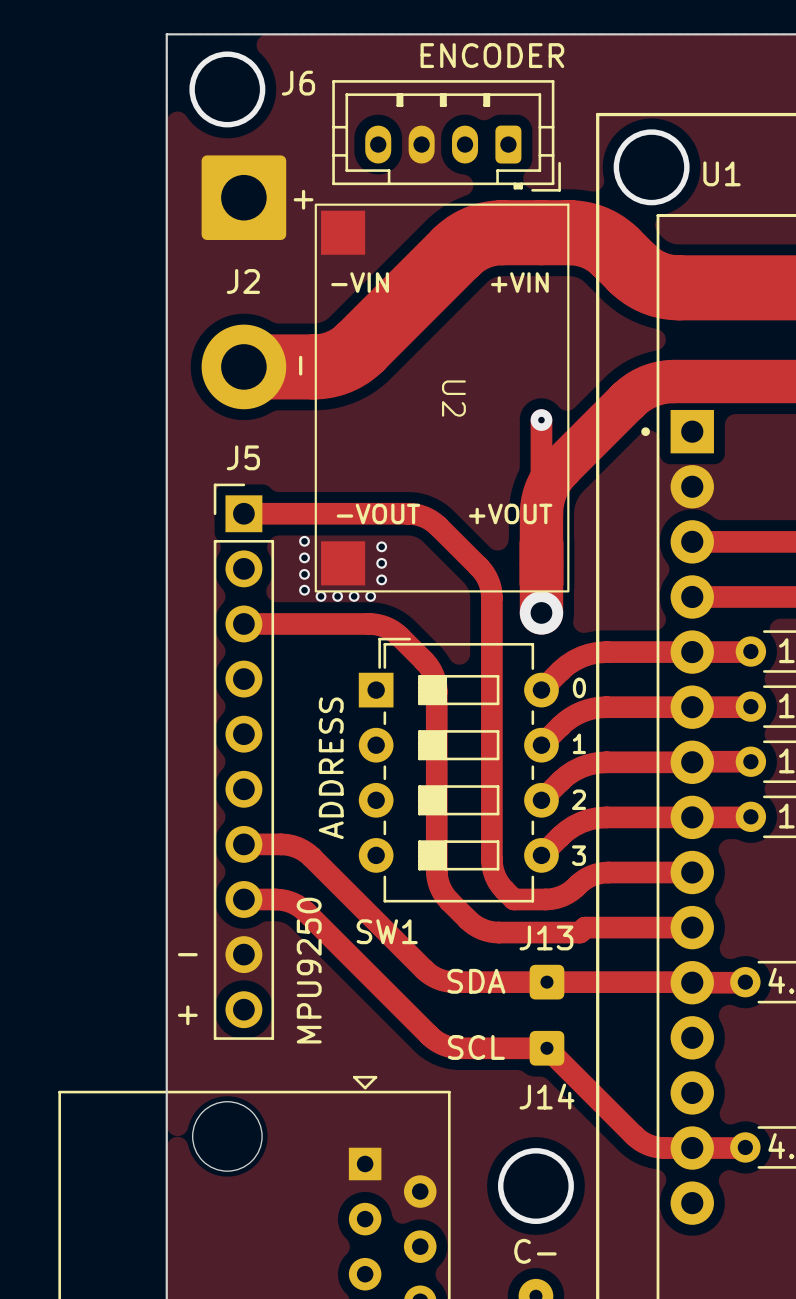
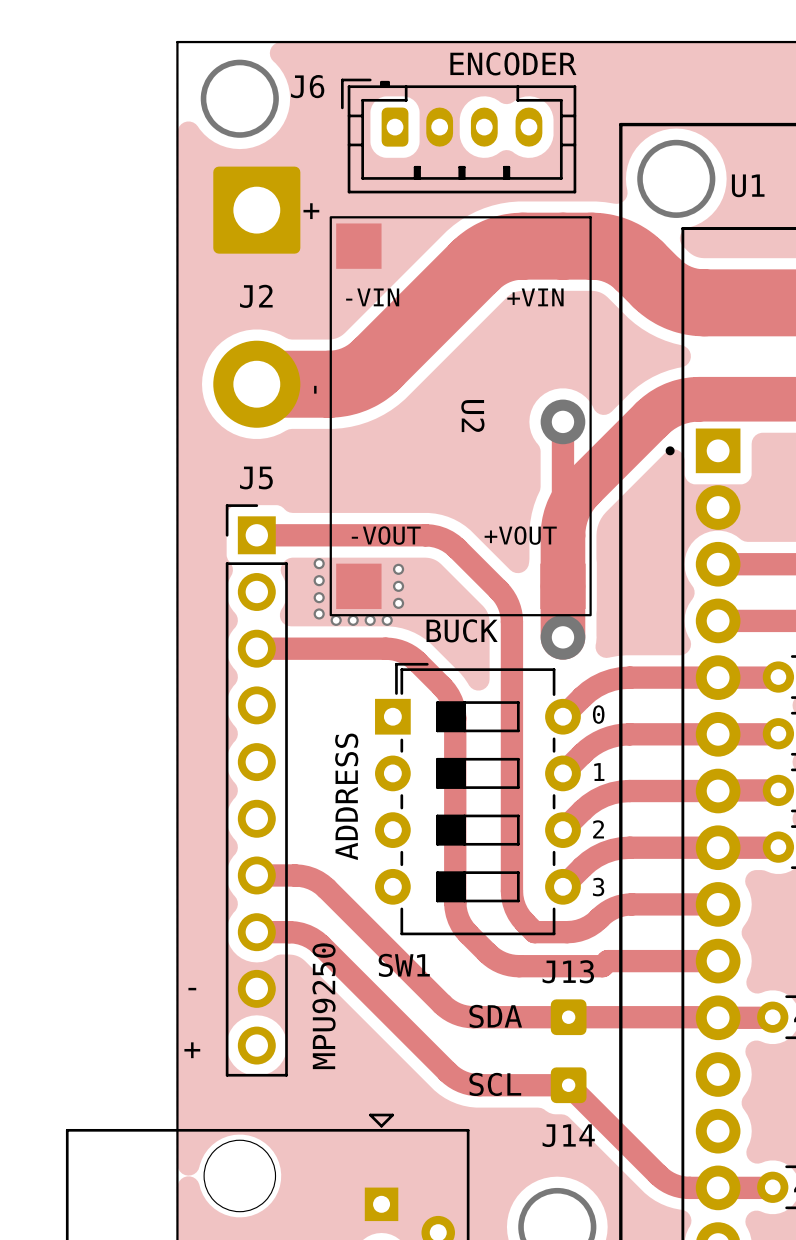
J6 rotation: 0° (446, 135) -> 180° (458, 136)
via size: [530, 409, 553, 431] -> [540, 399, 586, 445]
U2 value: none -> BUCK (462, 630)

